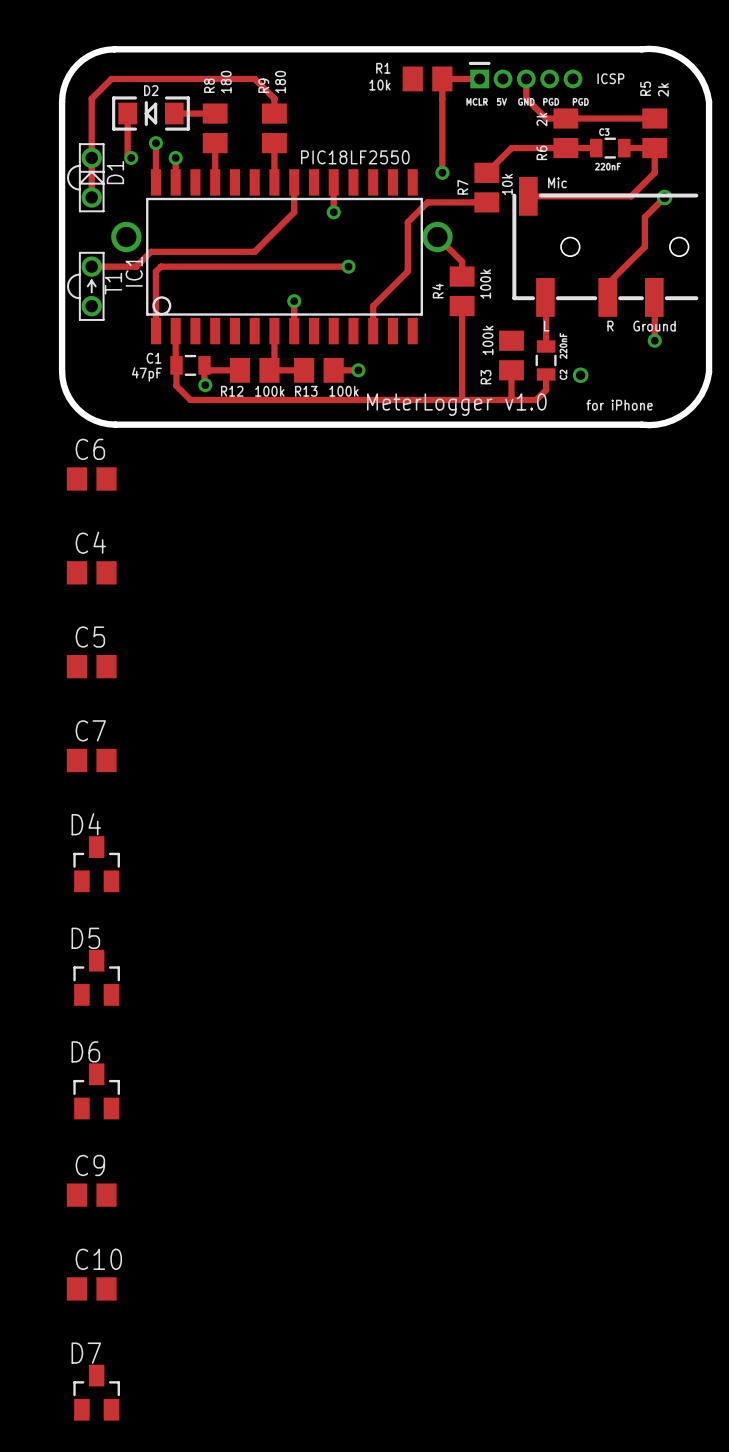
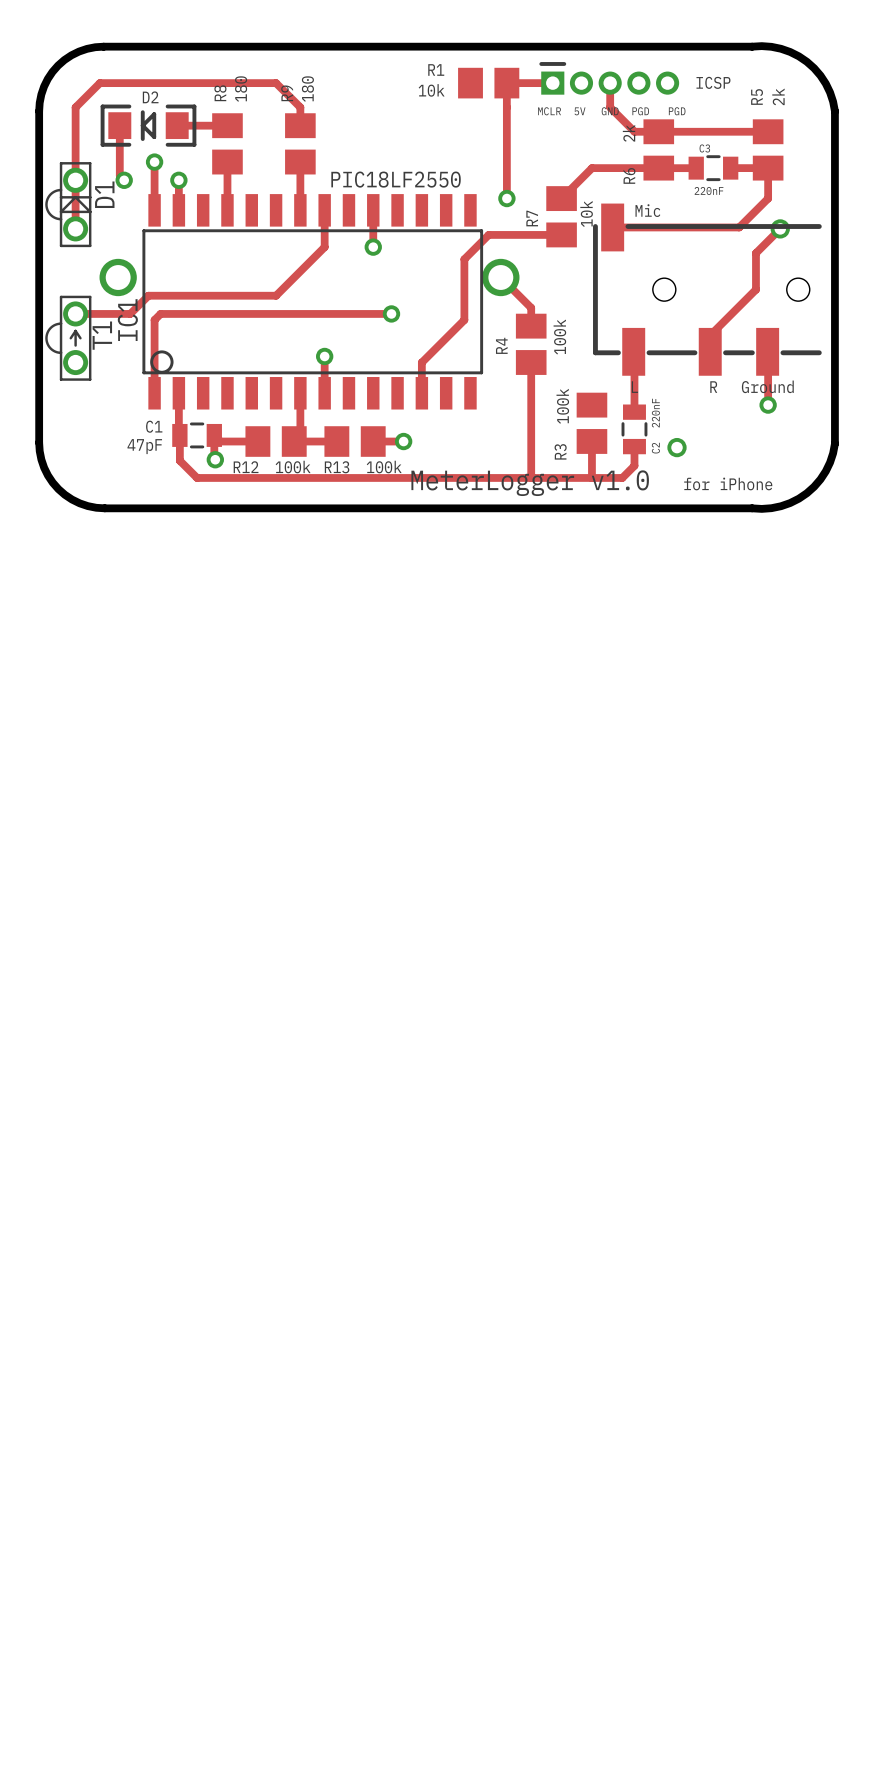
C6: (91, 478) -> none
C4: (91, 572) -> none
C5: (91, 666) -> none
C7: (91, 760) -> none
D4: (96, 864) -> none
D5: (96, 977) -> none
D6: (96, 1091) -> none
C9: (91, 1195) -> none
C10: (91, 1288) -> none
D7: (96, 1392) -> none

